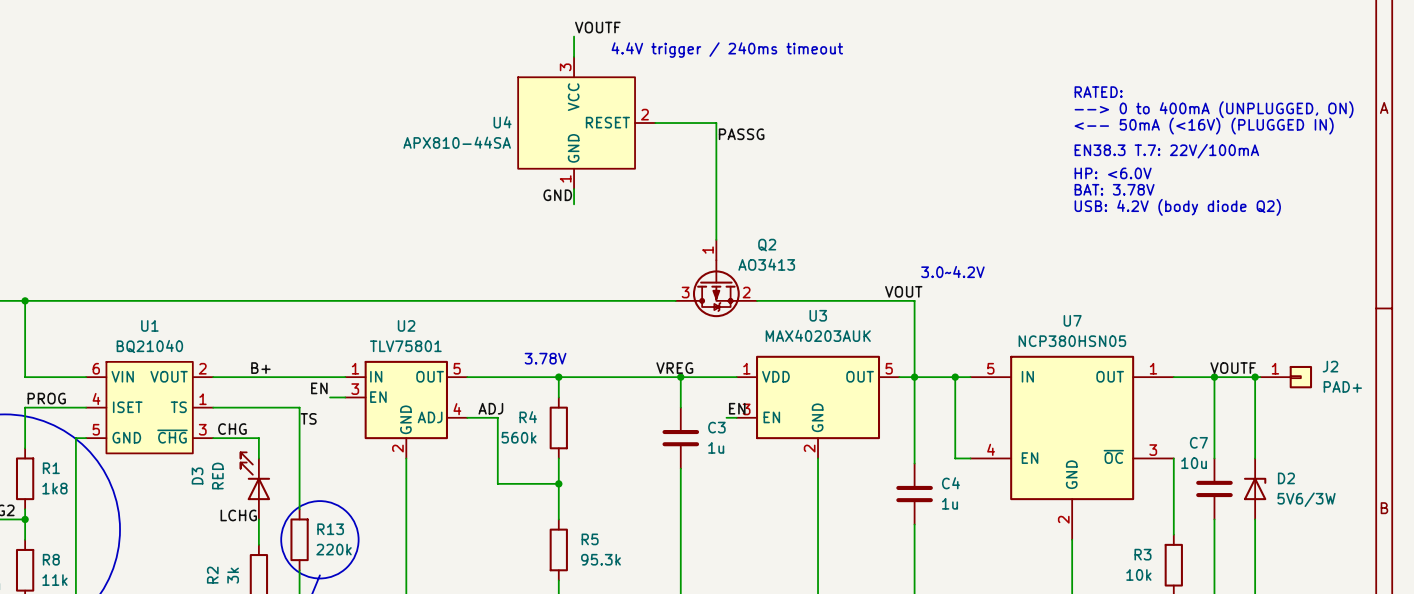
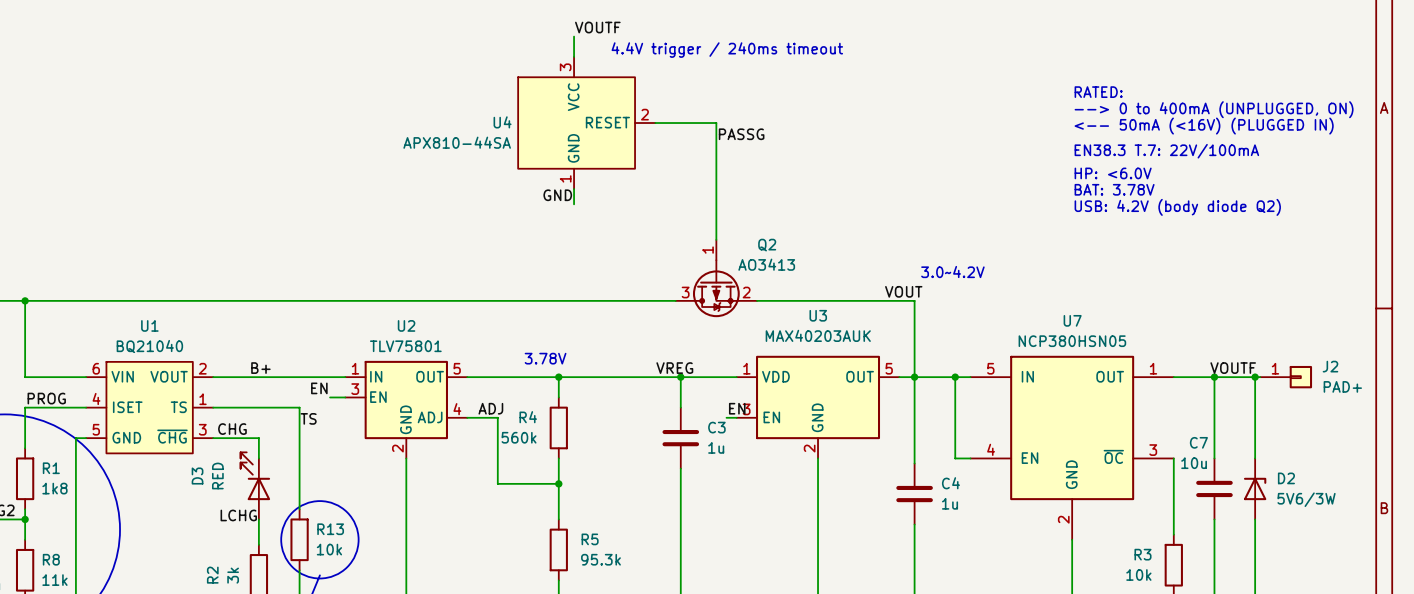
R13 value: 220k (334, 549) -> 10k (329, 549)

